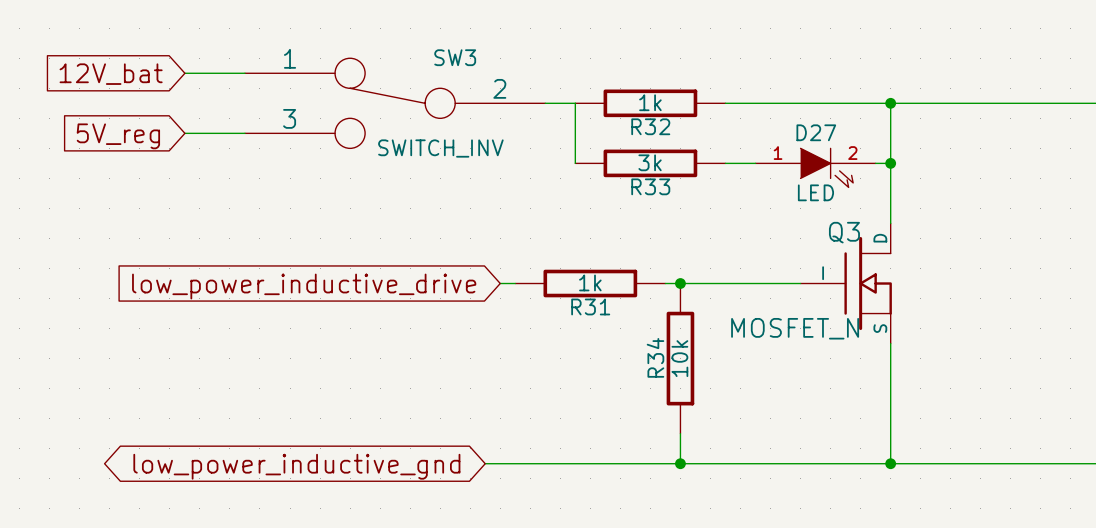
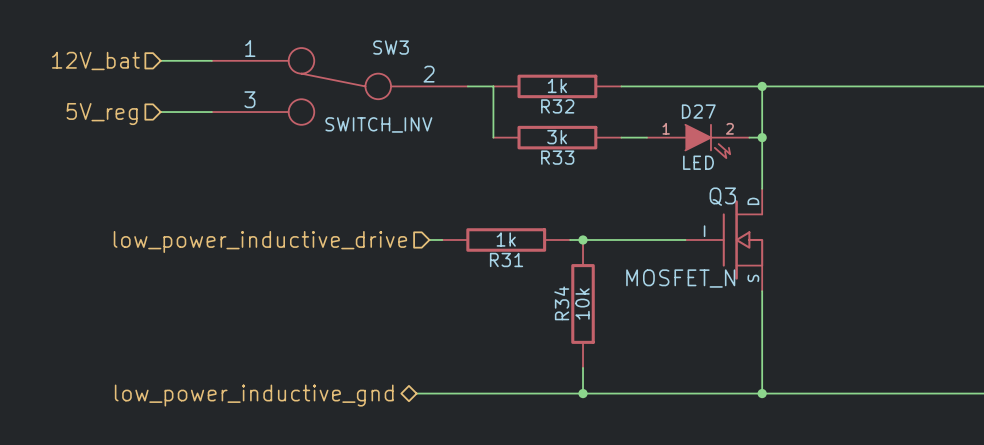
hierarchical label: none -> 12V_bat (95, 60)
global label: 12V_bat (111, 74) -> none
hierarchical label: none -> 5V_reg (102, 114)
global label: 5V_reg (118, 136) -> none
hierarchical label: none -> low_power_inductive_drive (260, 241)
global label: low_power_inductive_drive (304, 286) -> none
hierarchical label: none -> low_power_inductive_gnd (254, 395)
global label: low_power_inductive_gnd (296, 466) -> none

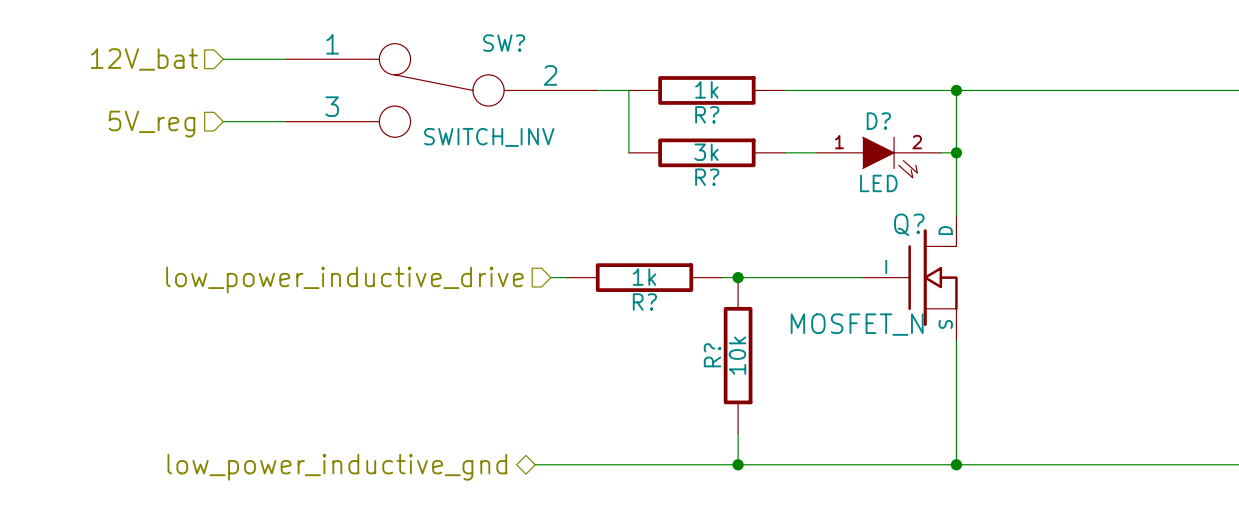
SW3 name: SW3 (391, 47) -> SW? (504, 43)
R32 name: R32 (557, 106) -> R? (707, 114)
D27 name: D27 (698, 111) -> D? (878, 121)
R33 name: R33 (557, 157) -> R? (707, 177)
Q3 name: Q3 (722, 196) -> Q? (909, 224)
R31 name: R31 (506, 259) -> R? (644, 301)
R34 name: R34 (561, 303) -> R? (712, 355)

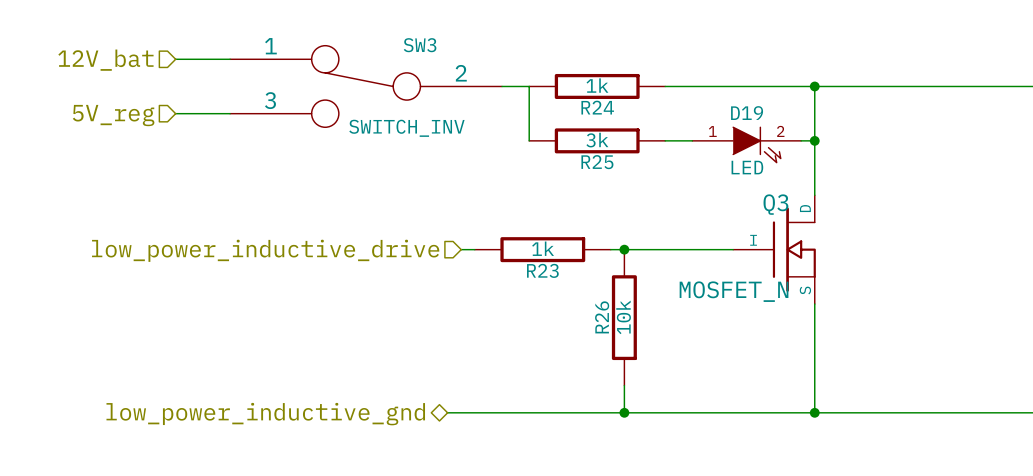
SW? name: SW? (504, 43) -> SW3 (420, 45)
R? name: R? (707, 114) -> R24 (597, 107)
D? name: D? (878, 121) -> D19 (747, 113)
R? name: R? (707, 177) -> R25 (597, 162)
Q? name: Q? (909, 224) -> Q3 (775, 204)
R? name: R? (644, 301) -> R23 (542, 270)
R? name: R? (712, 355) -> R26 (602, 317)

